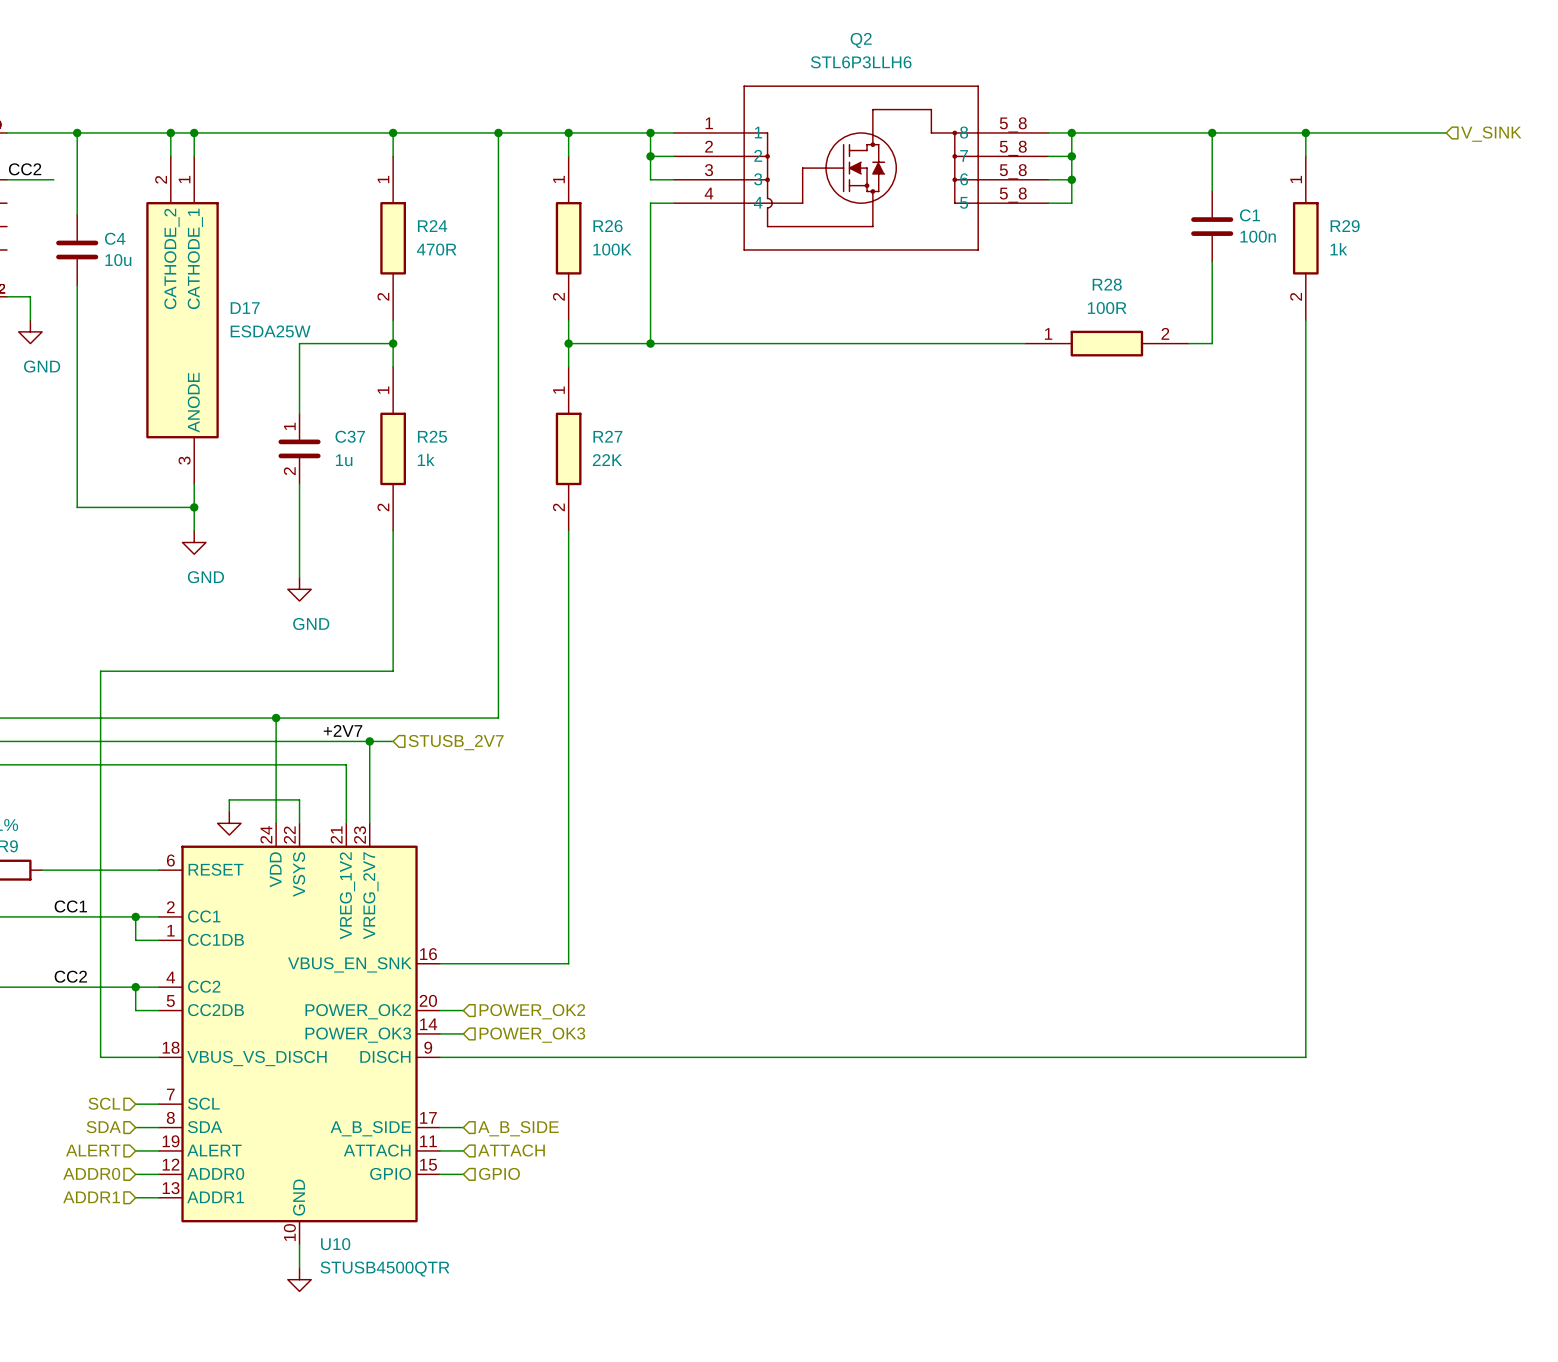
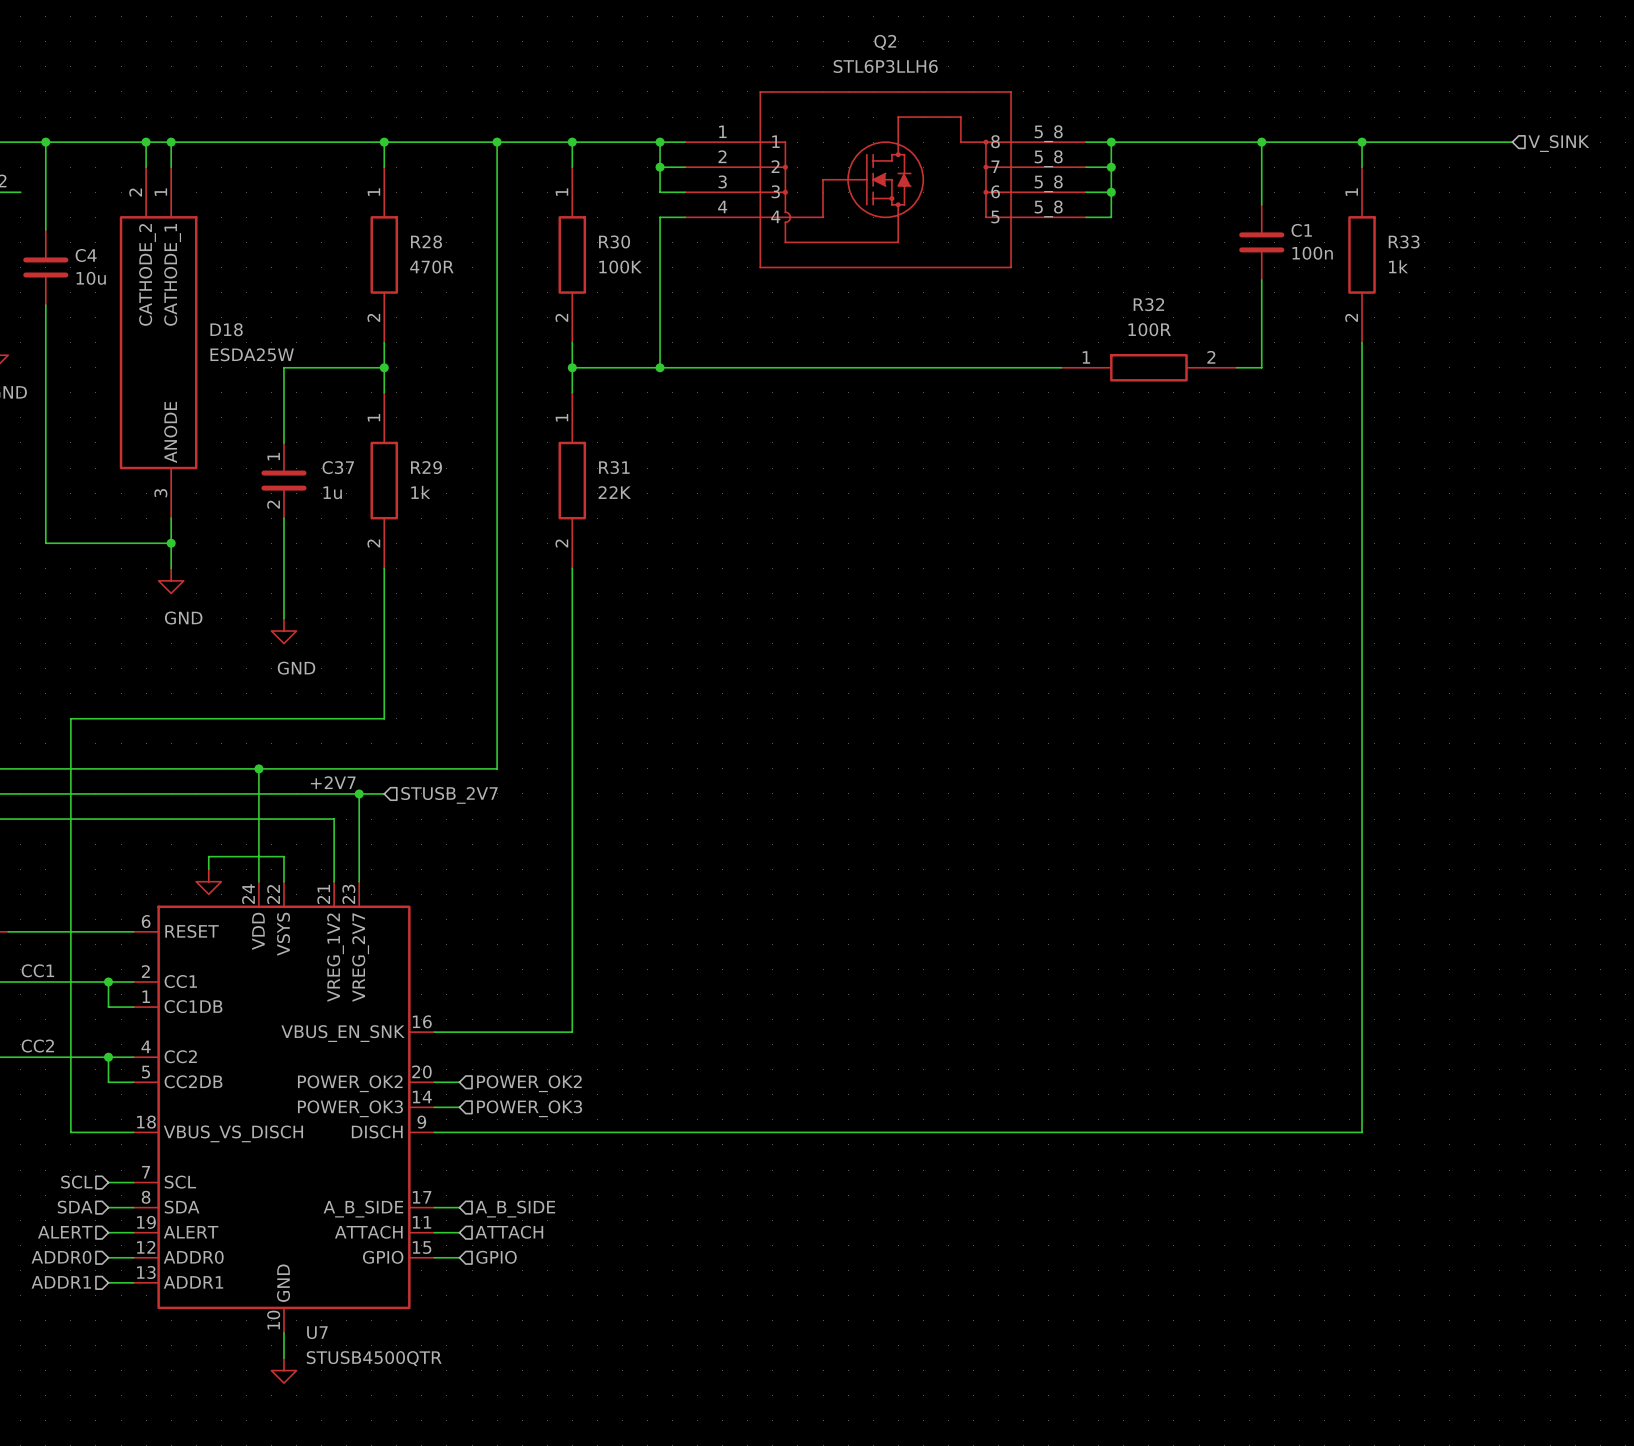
R24 name: R24 (432, 226) -> R28 (426, 241)
R26 name: R26 (607, 226) -> R30 (614, 241)
R29 name: R29 (1345, 226) -> R33 (1404, 241)
R28 name: R28 (1107, 284) -> R32 (1148, 304)
D17 name: D17 (245, 308) -> D18 (226, 329)
R25 name: R25 (432, 436) -> R29 (426, 467)
R27 name: R27 (607, 436) -> R31 (614, 467)
U10 name: U10 (335, 1244) -> U7 (317, 1332)

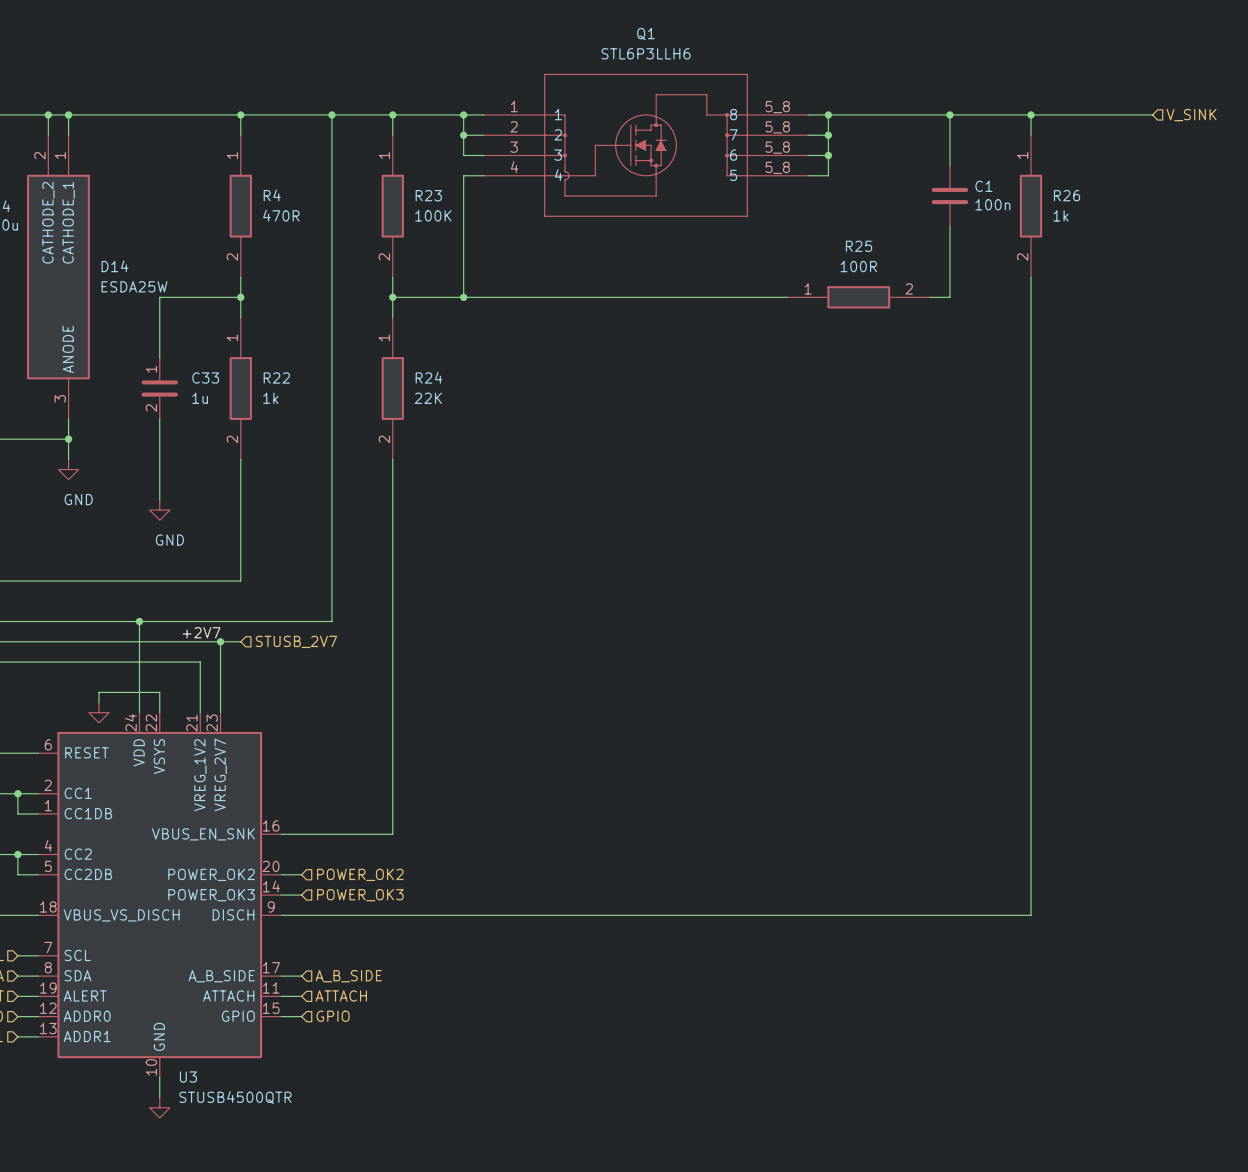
Q2 name: Q2 (885, 42) -> Q1 (646, 34)
R28 name: R28 (426, 241) -> R4 (272, 195)
R30 name: R30 (614, 241) -> R23 (428, 195)
R33 name: R33 (1404, 241) -> R26 (1067, 195)
R32 name: R32 (1148, 304) -> R25 (859, 246)
D18 name: D18 (226, 329) -> D14 (114, 266)
C37 name: C37 (338, 467) -> C33 (205, 378)
R29 name: R29 (426, 467) -> R22 (276, 378)
R31 name: R31 (614, 467) -> R24 (429, 377)
U7 name: U7 (317, 1332) -> U3 (188, 1077)

